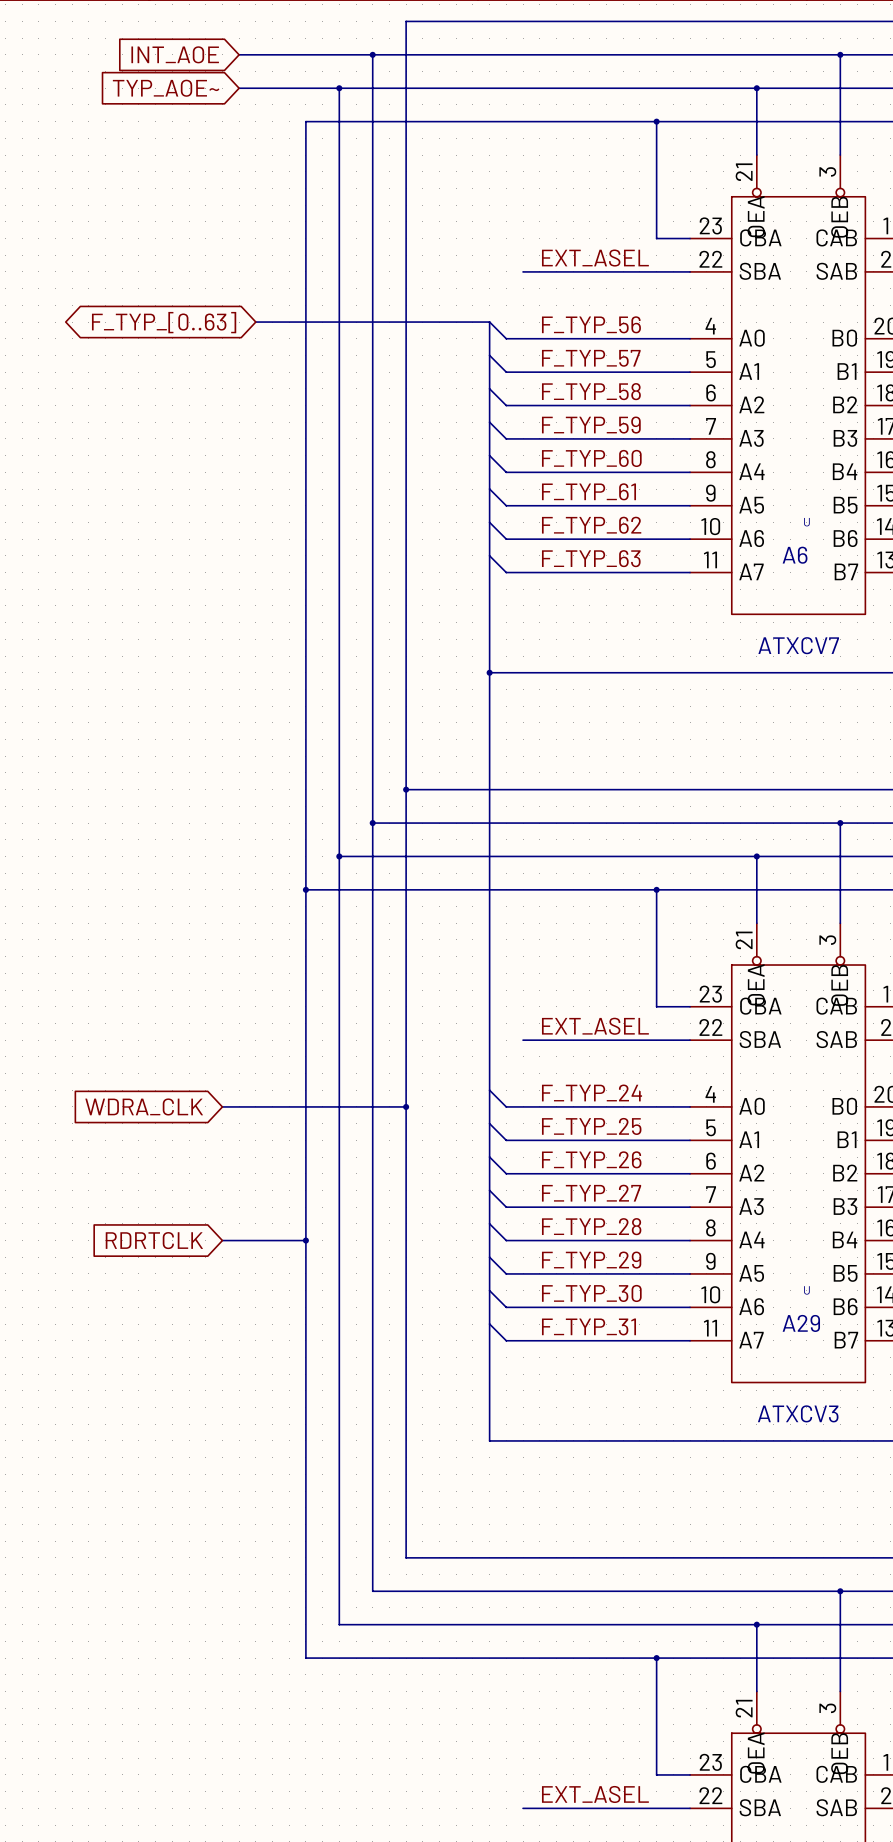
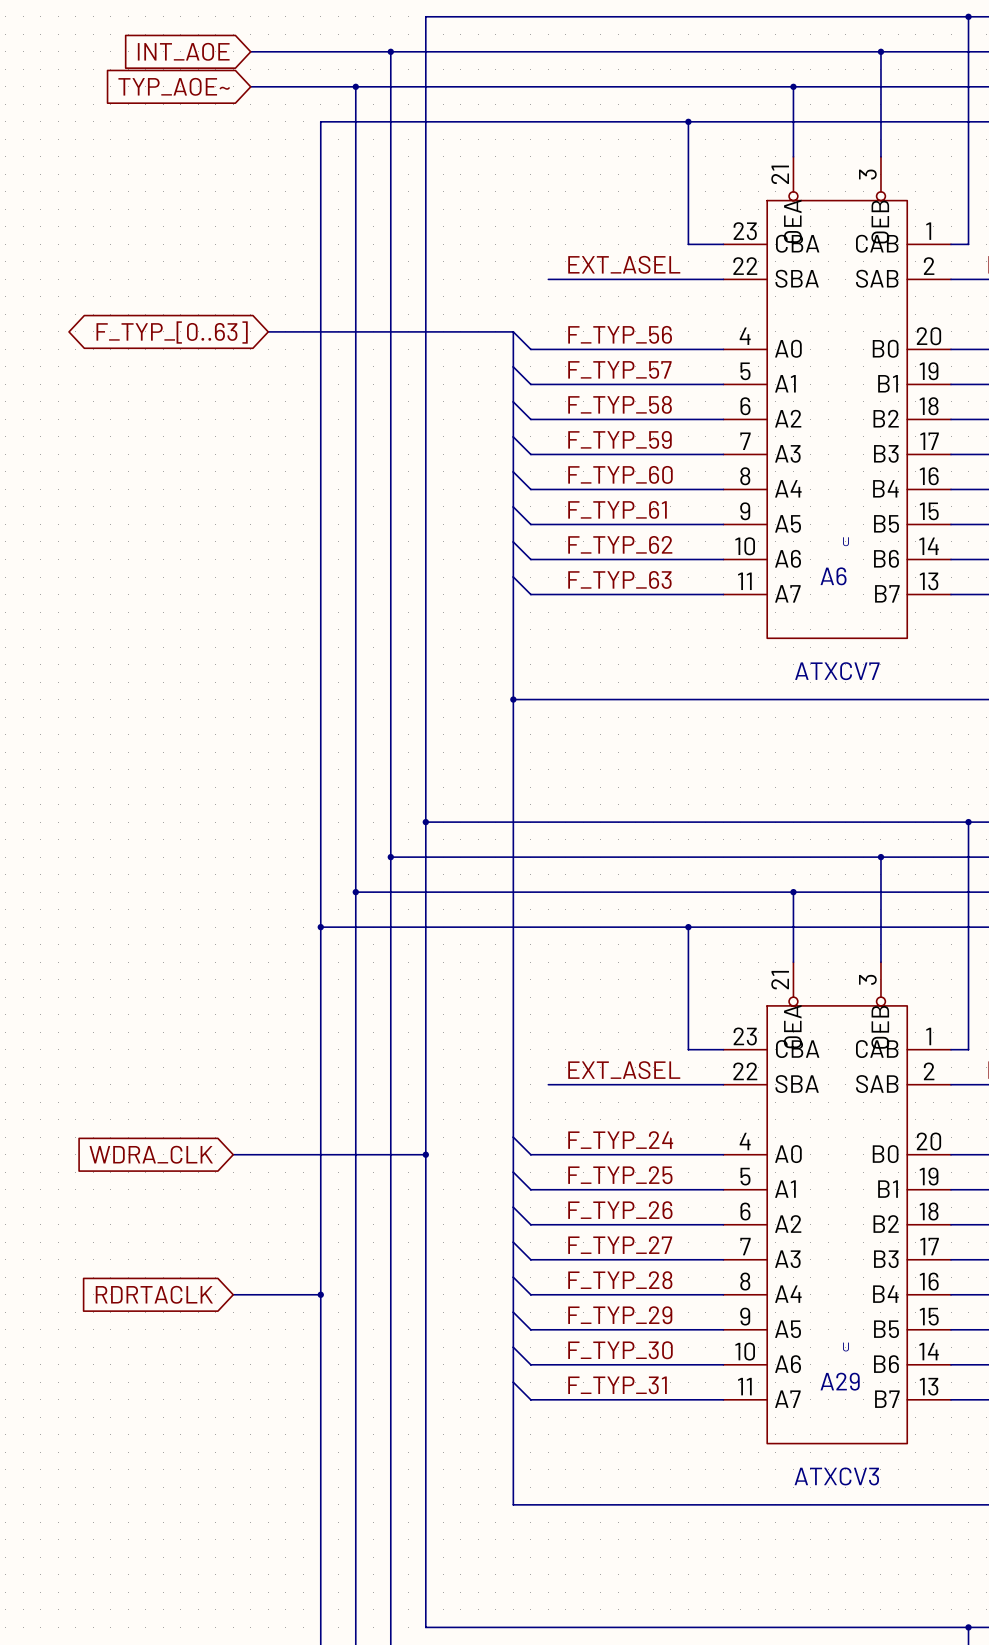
global label: RDRTCLK (154, 1240) -> RDRTACLK (154, 1294)

